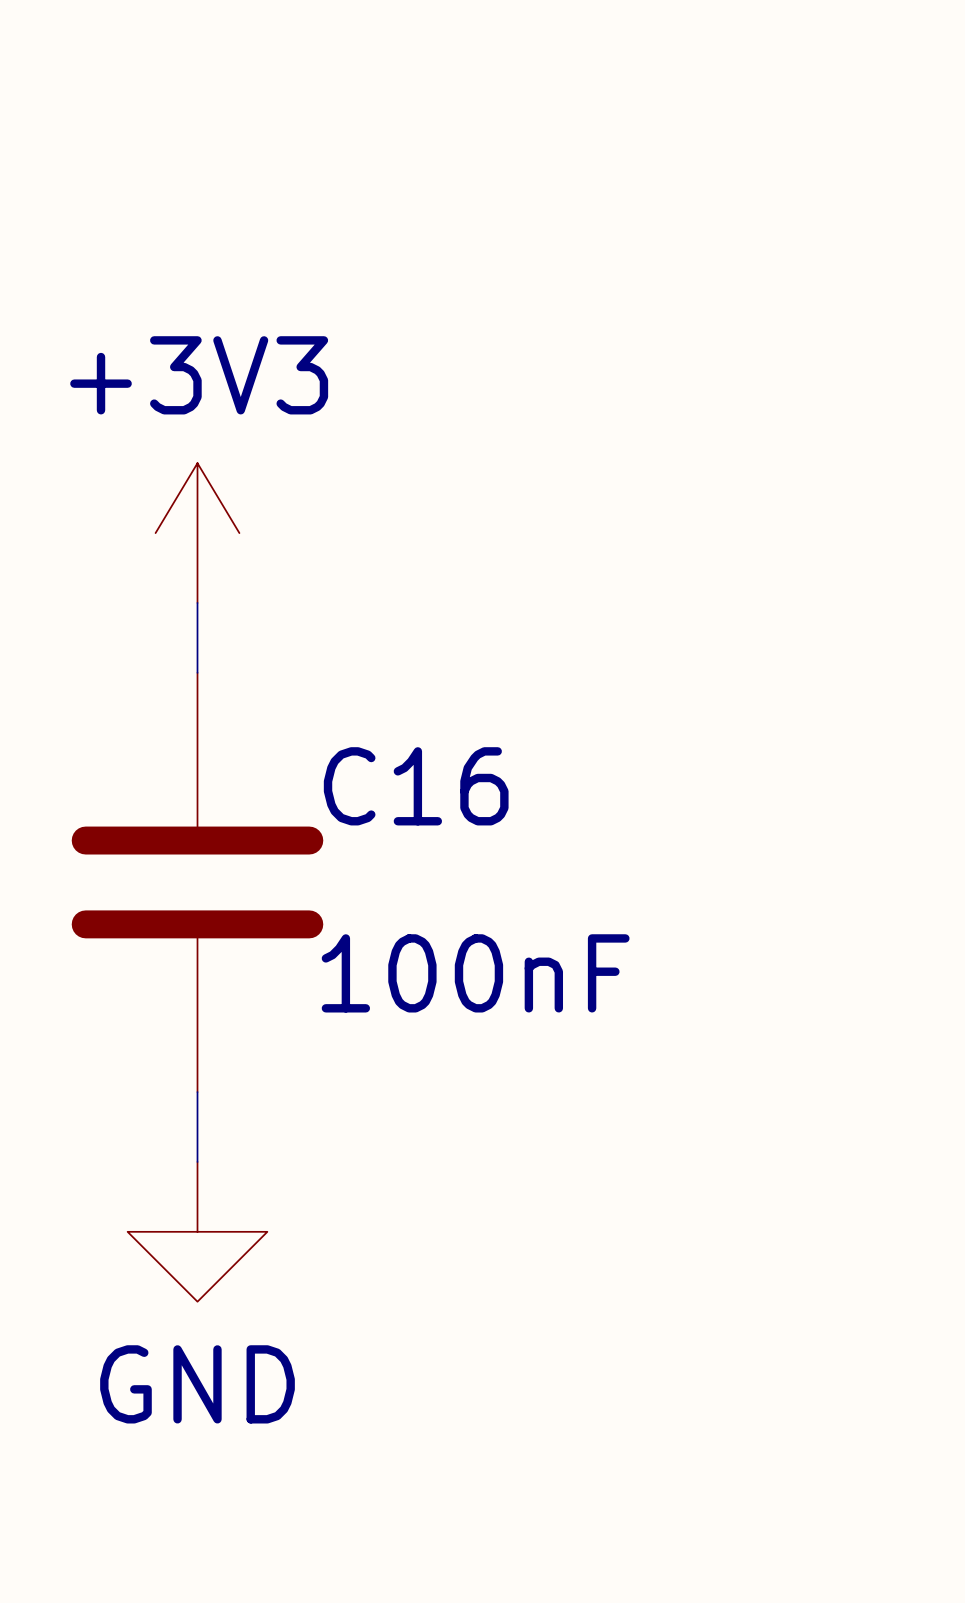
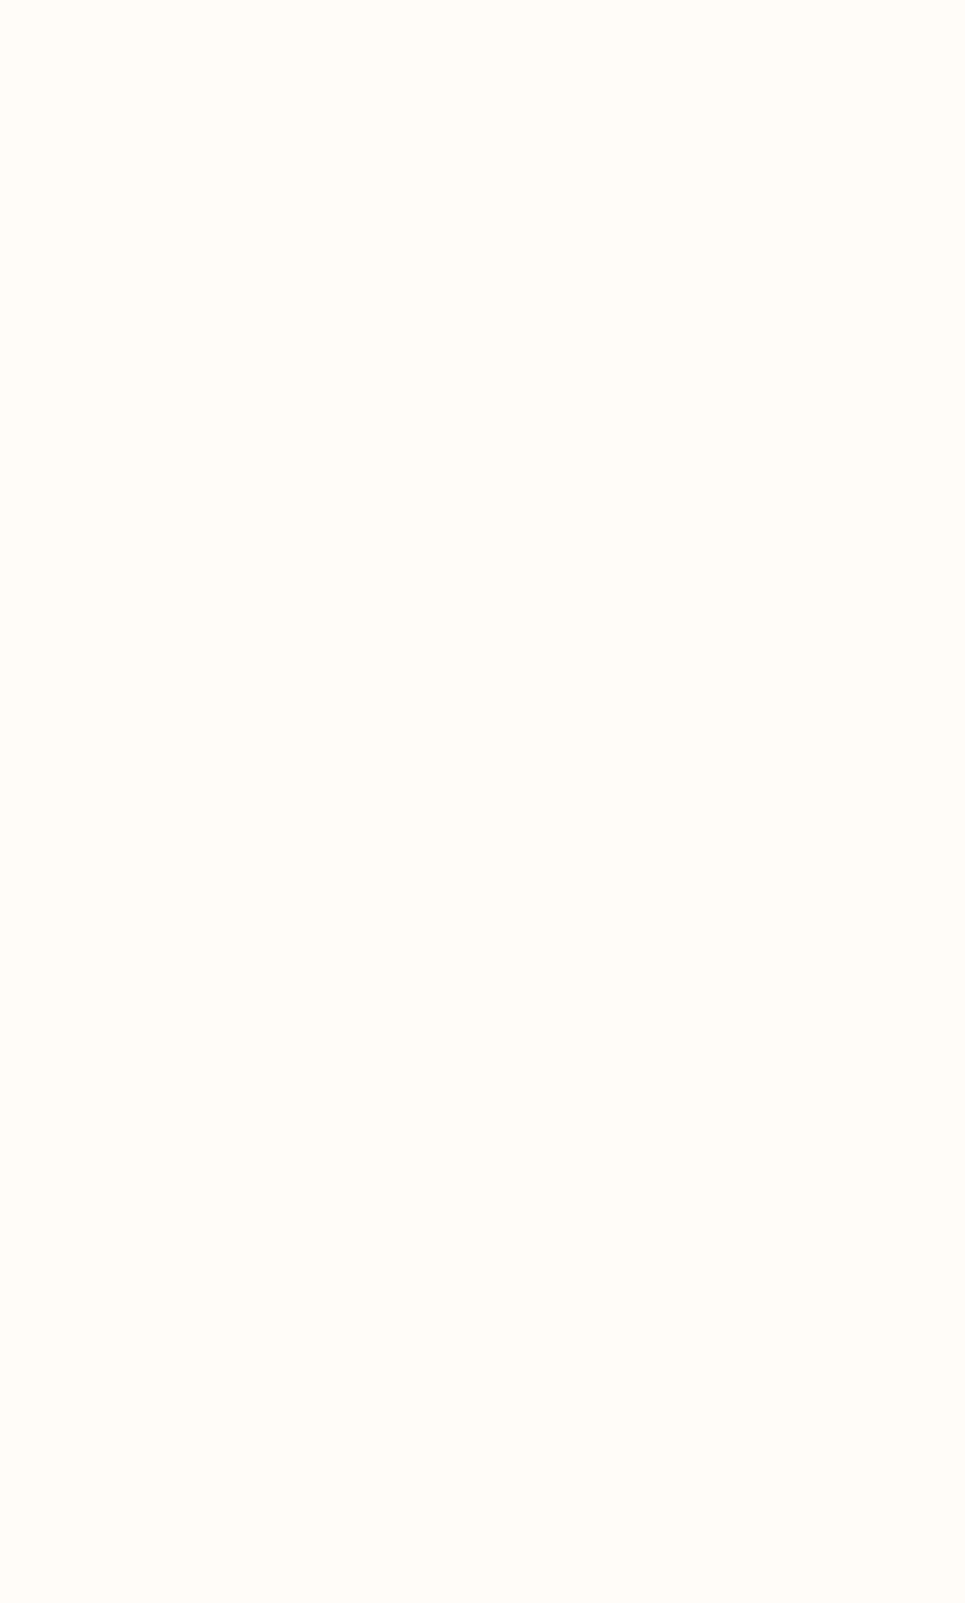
power symbol: +3V3 (197, 533) -> none
wire: (197, 602) (197, 672) -> none
C16: 100nF (197, 882) -> none
wire: (197, 1092) (197, 1161) -> none
power symbol: GND (197, 1231) -> none

